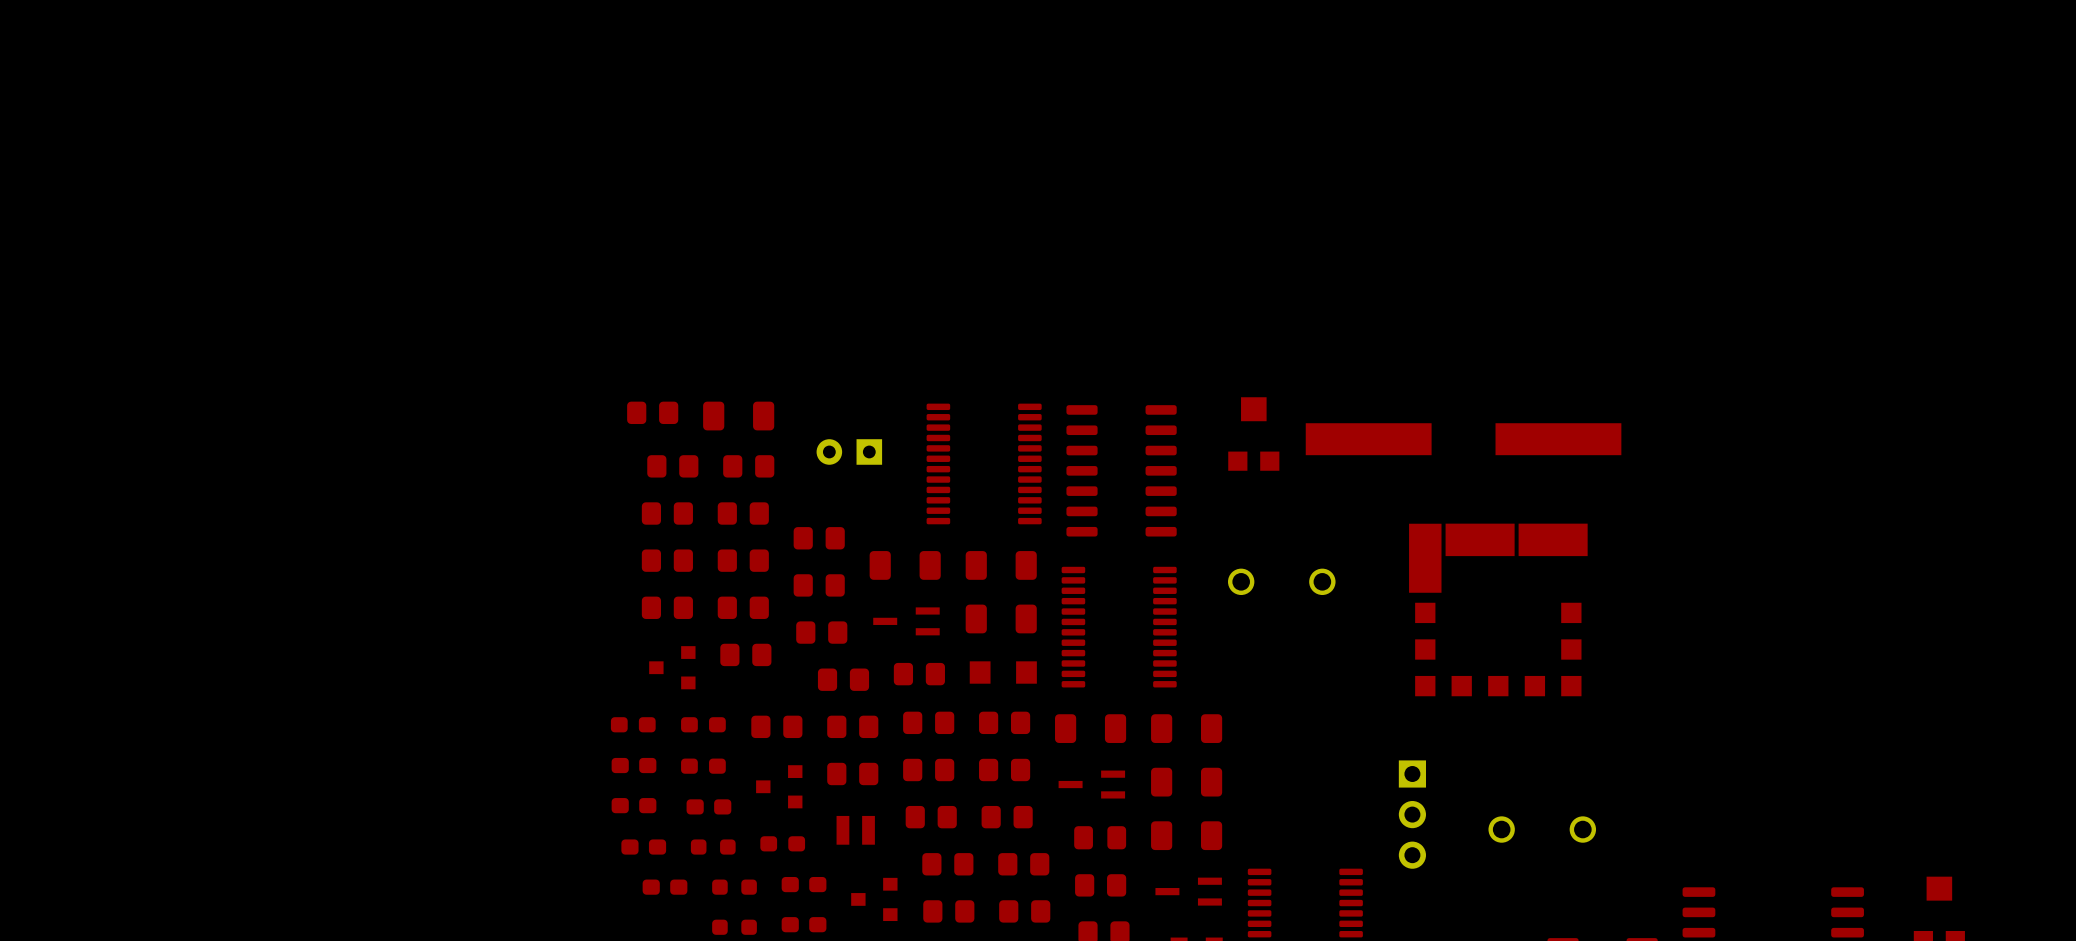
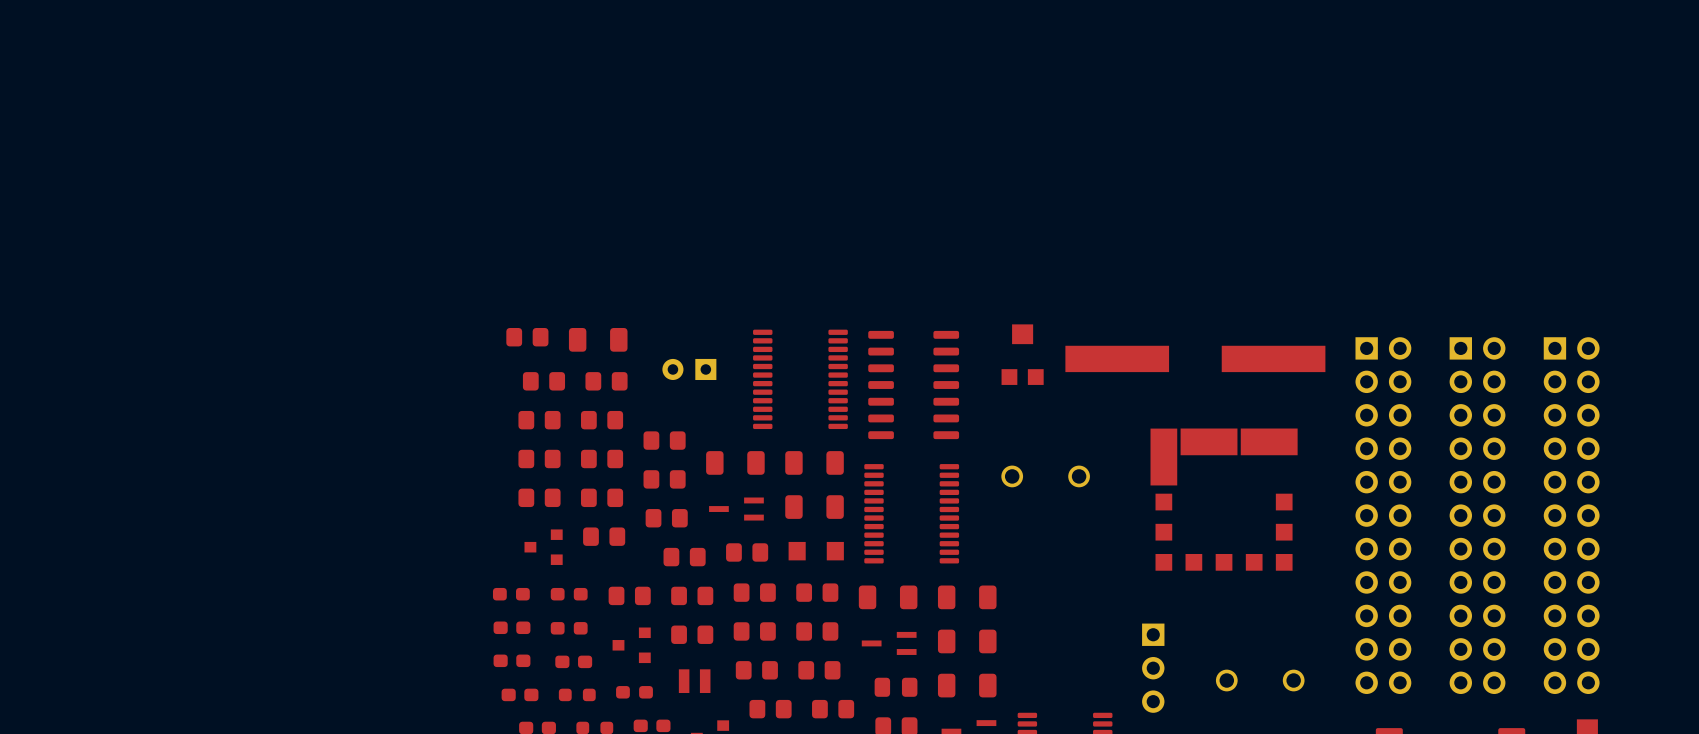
part: none -> (1383, 515)
part: none -> (1477, 515)
part: none -> (1571, 515)

